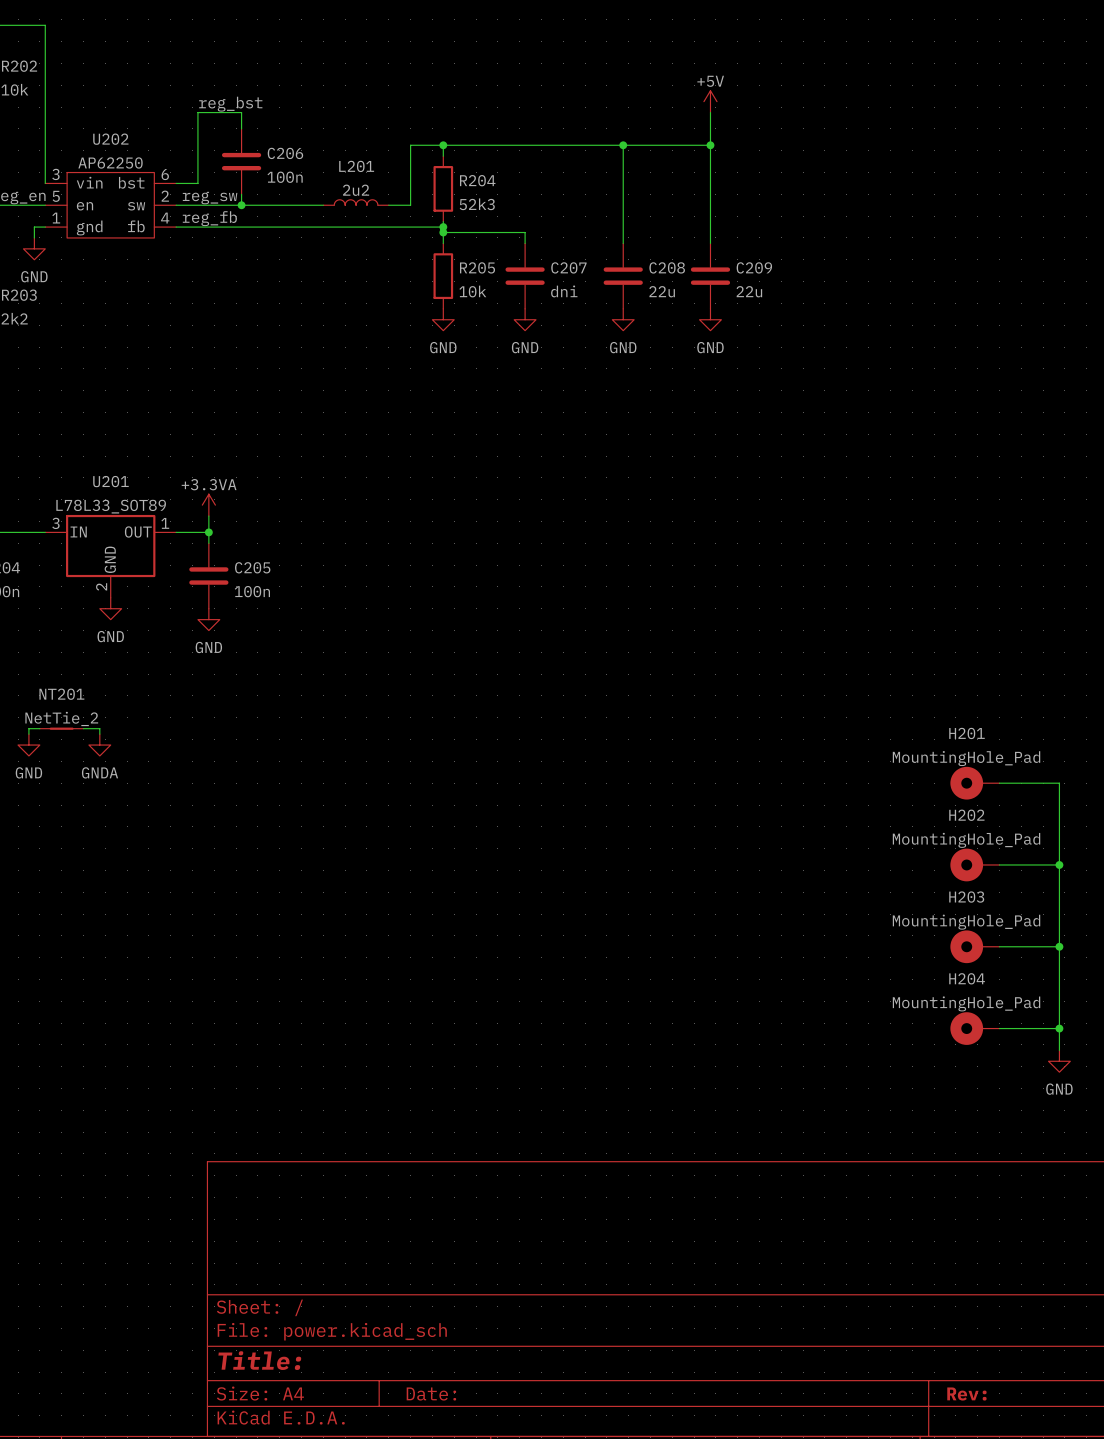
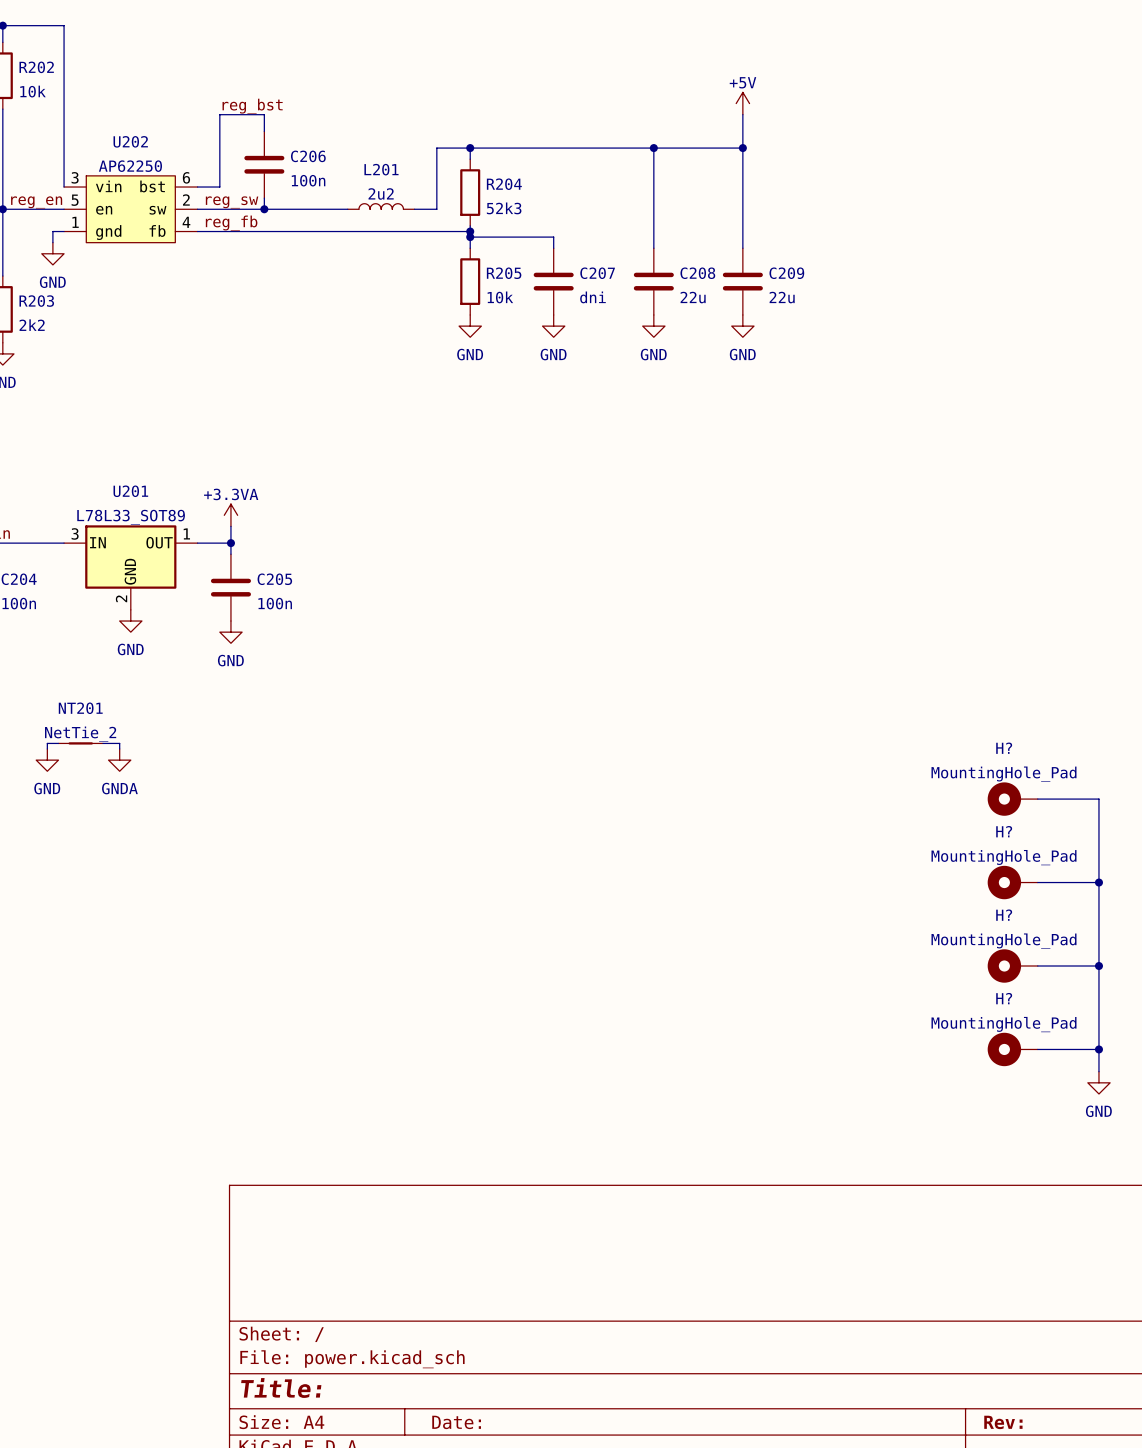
H201 name: H201 (966, 733) -> H? (1004, 748)
H202 name: H202 (966, 815) -> H? (1004, 831)
H203 name: H203 (966, 897) -> H? (1004, 915)
H204 name: H204 (967, 978) -> H? (1004, 998)

